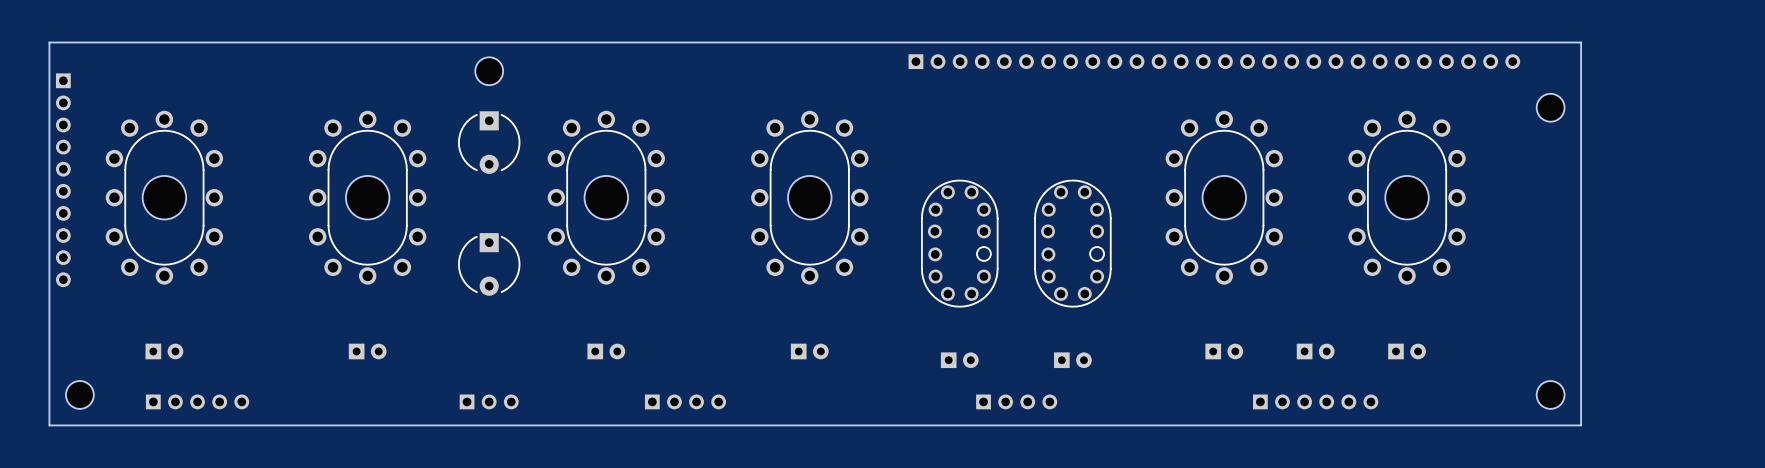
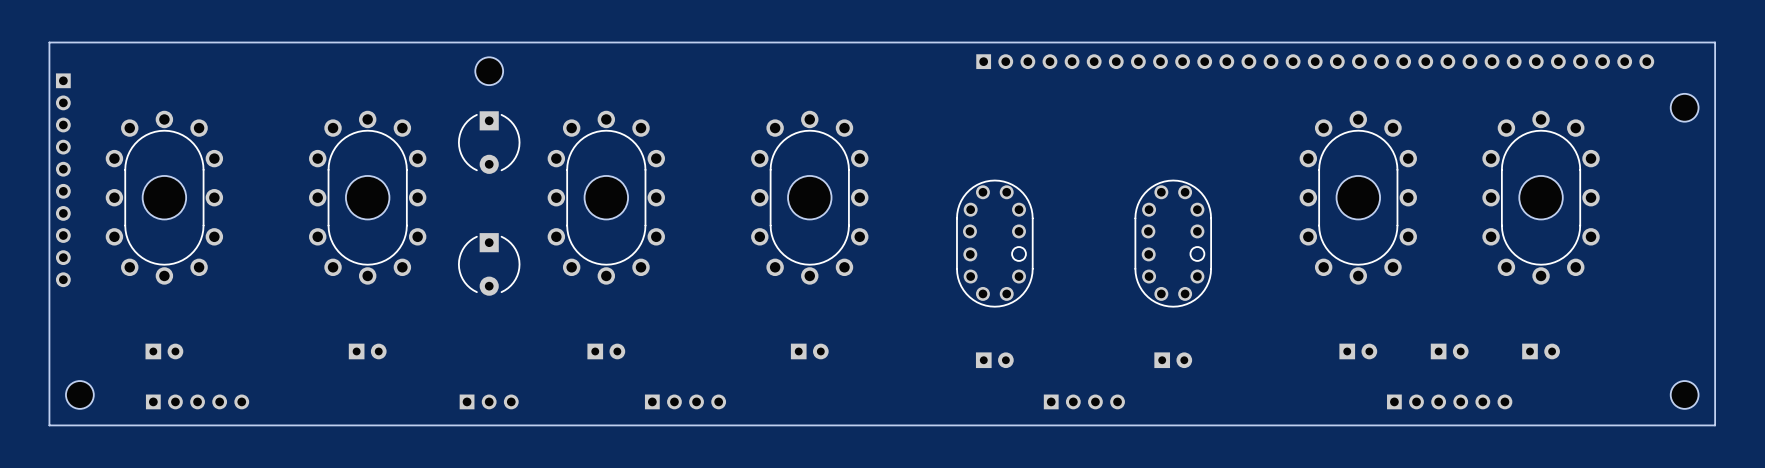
board edge: (1581, 42) (1581, 425) -> (1581, 42) (1715, 42) (1715, 425) (1581, 425)
part: (1214, 61) -> none
part: none -> (1315, 61)
part position: (1550, 107) -> (1684, 107)
part: (1224, 197) -> none
part position: (1407, 197) -> (1358, 197)
part: none -> (1541, 197)
part position: (959, 243) -> (994, 243)
part: (1072, 243) -> none
part: none -> (1173, 243)
part: (1224, 351) -> none
part: (1315, 351) -> none
part: none -> (1358, 351)
part: (1407, 351) -> none
part: none -> (1449, 351)
part: none -> (1541, 351)
part position: (959, 360) -> (994, 360)
part: (1072, 360) -> none
part: none -> (1173, 360)
part position: (1550, 394) -> (1684, 394)
part position: (1016, 401) -> (1084, 401)
part position: (1315, 401) -> (1449, 401)

